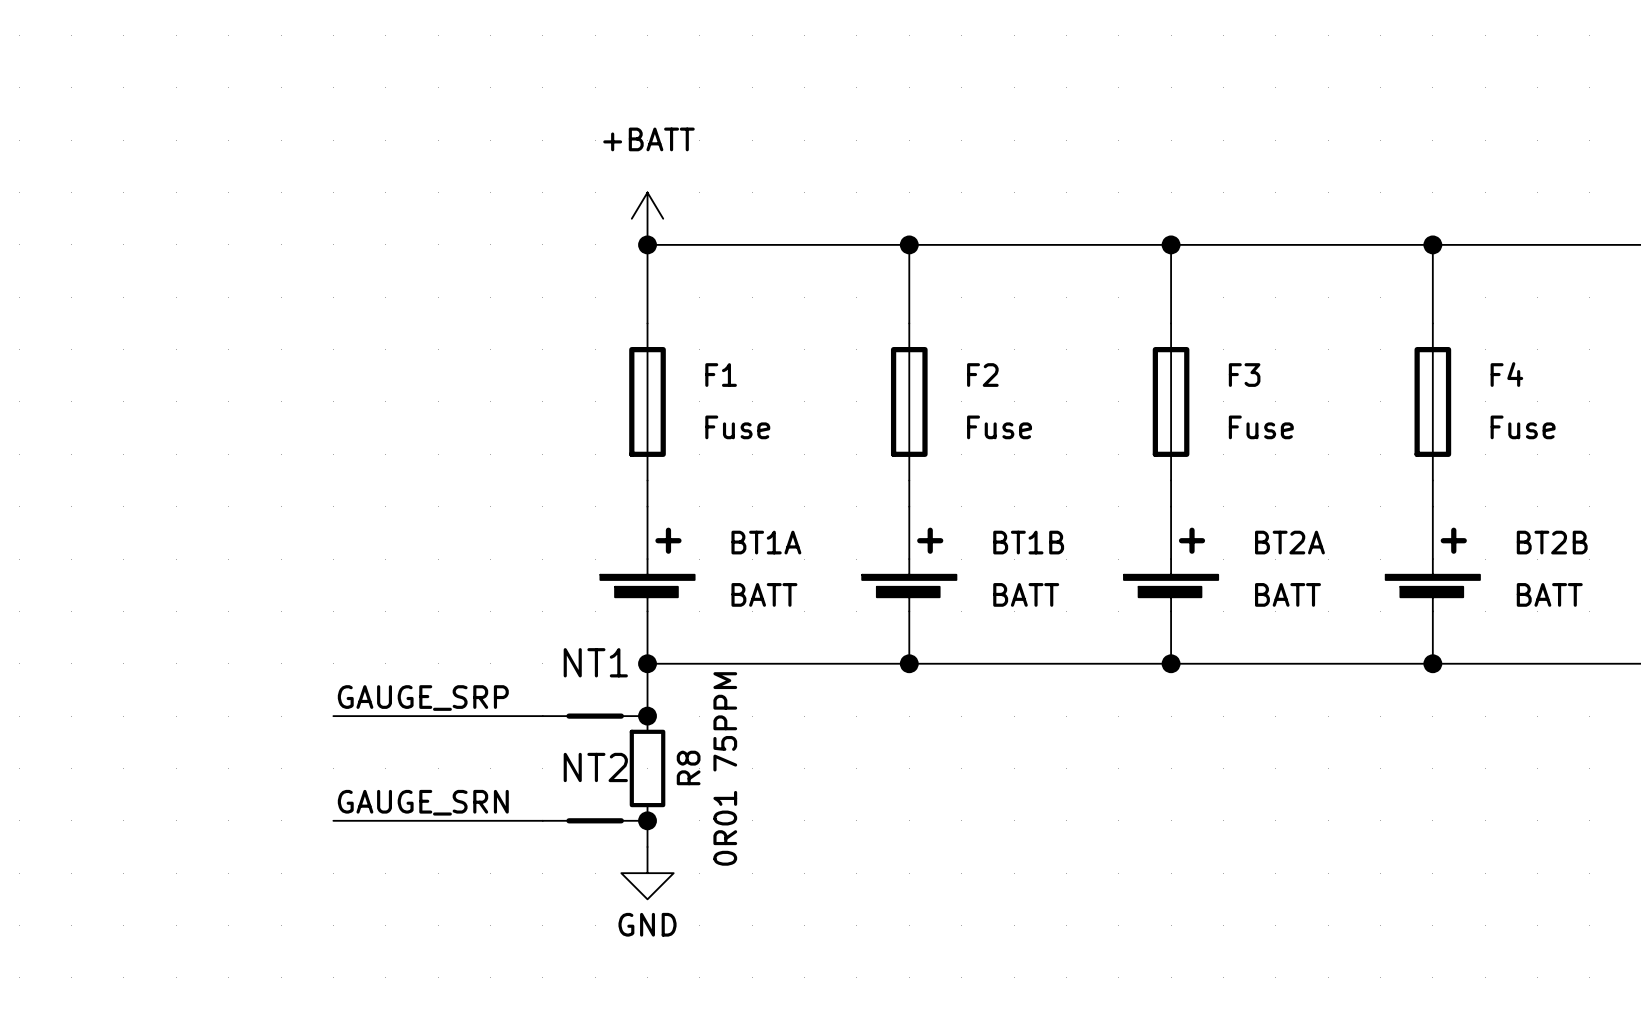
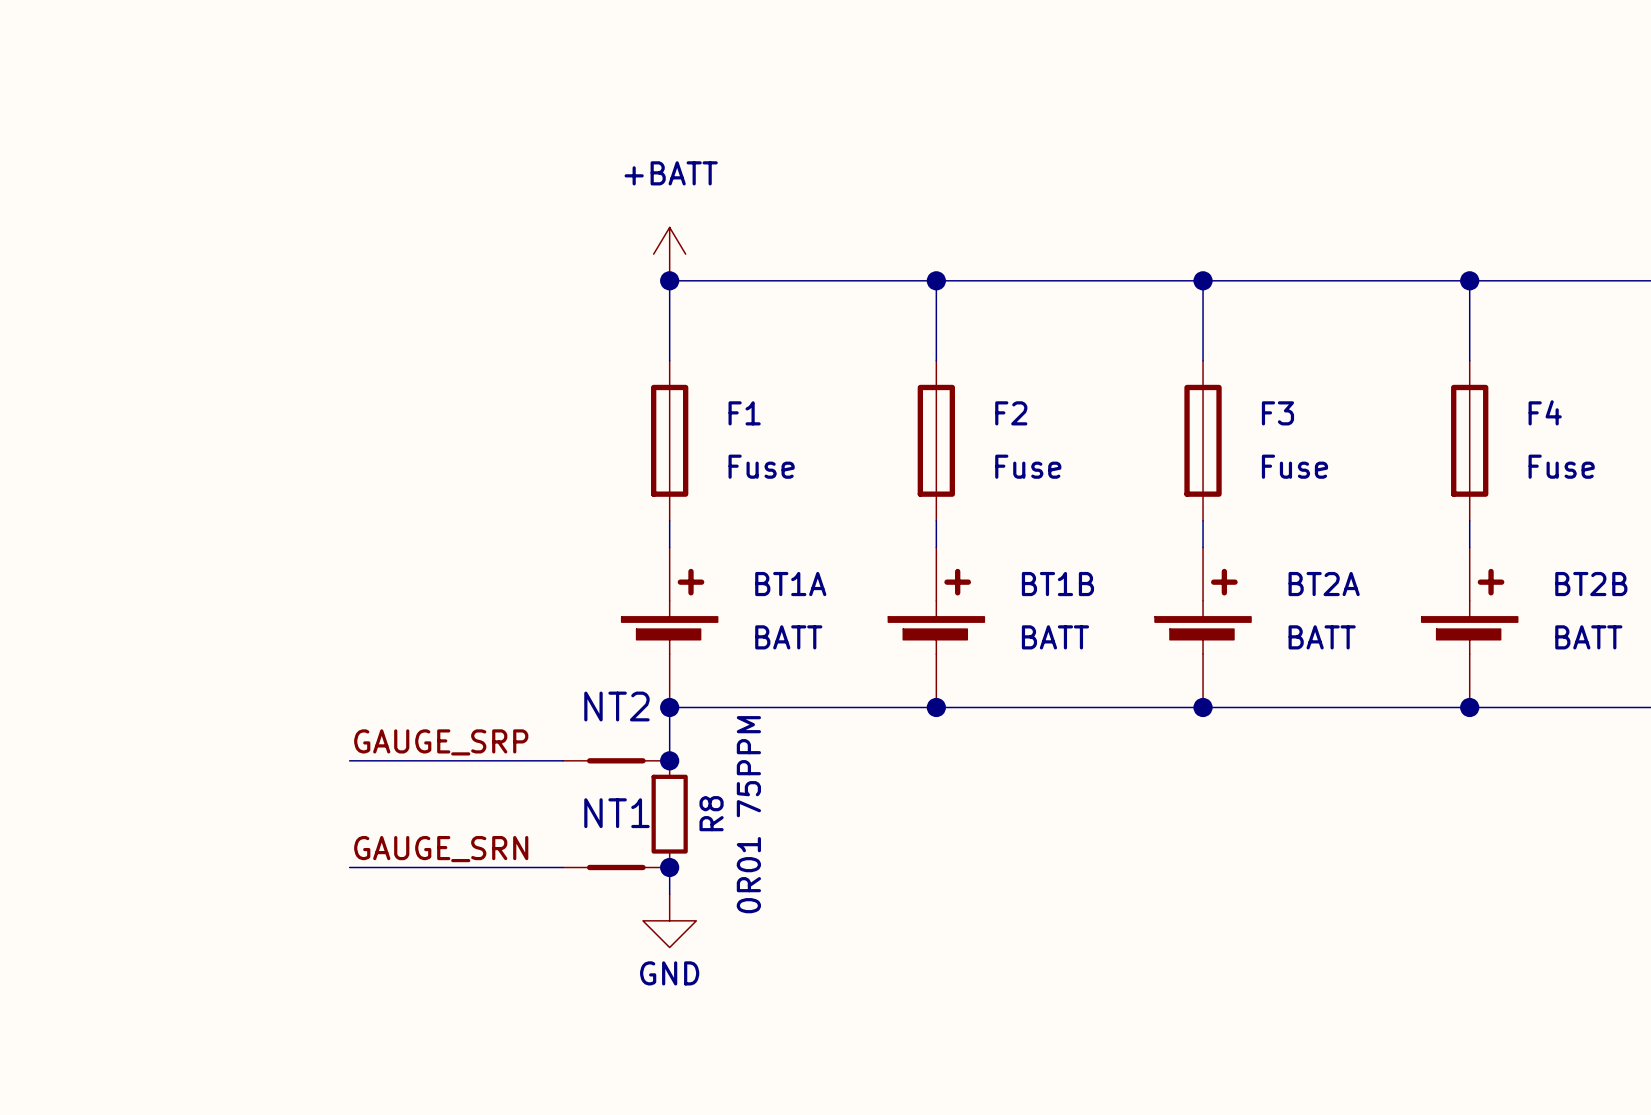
NT1 name: NT1 (595, 662) -> NT2 (616, 706)
NT2 name: NT2 (595, 767) -> NT1 (616, 813)

